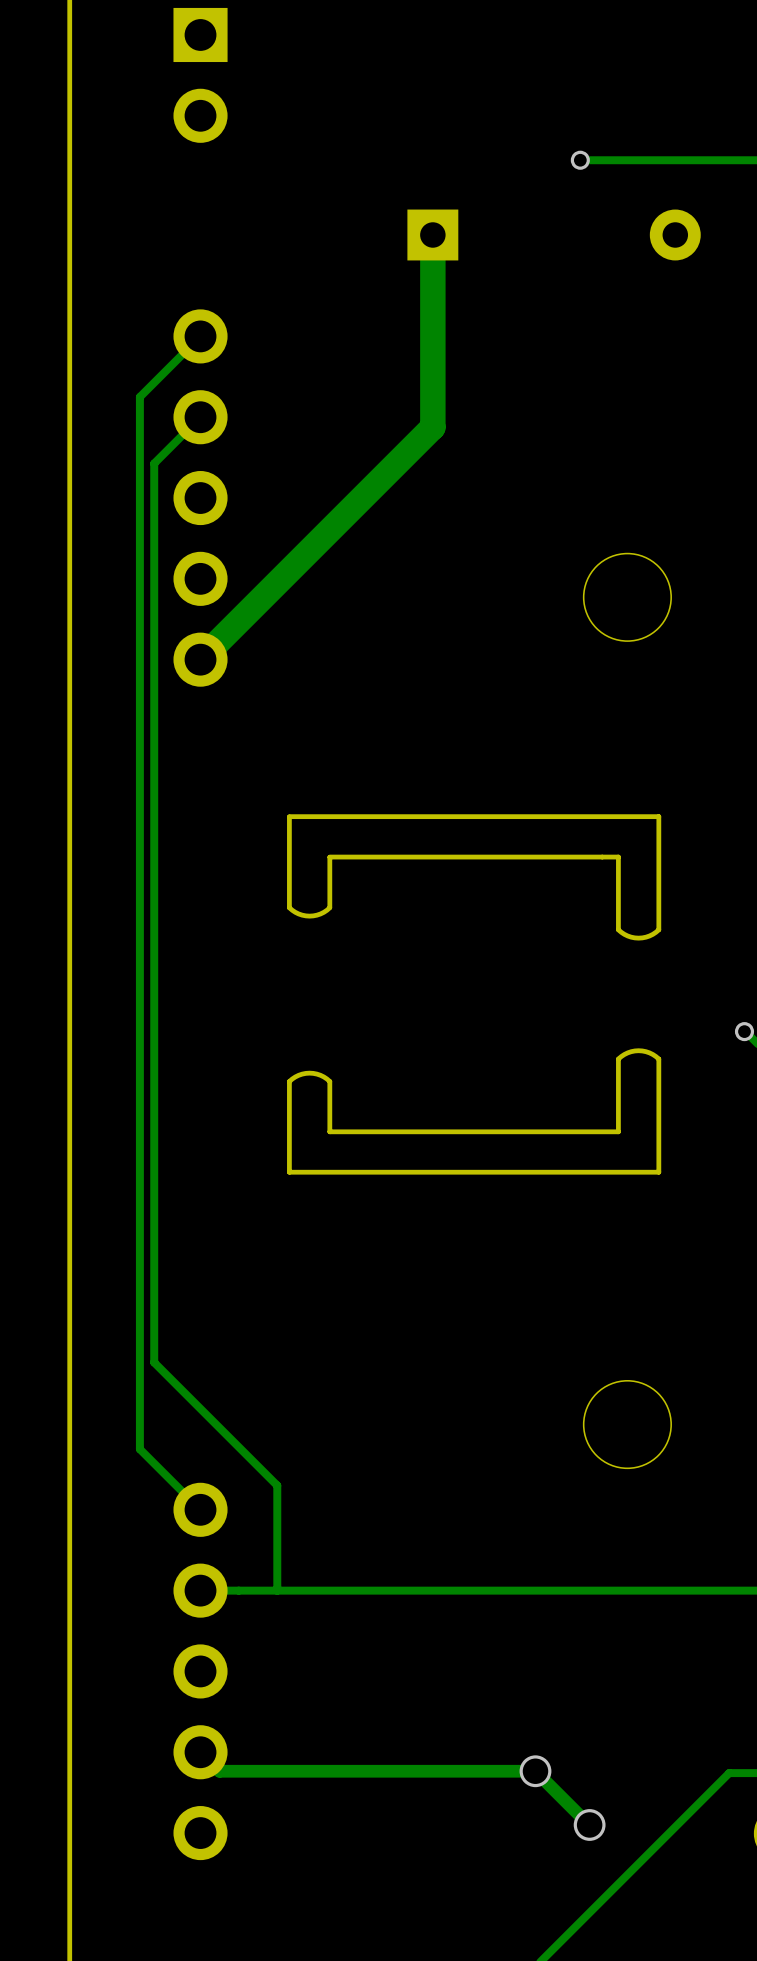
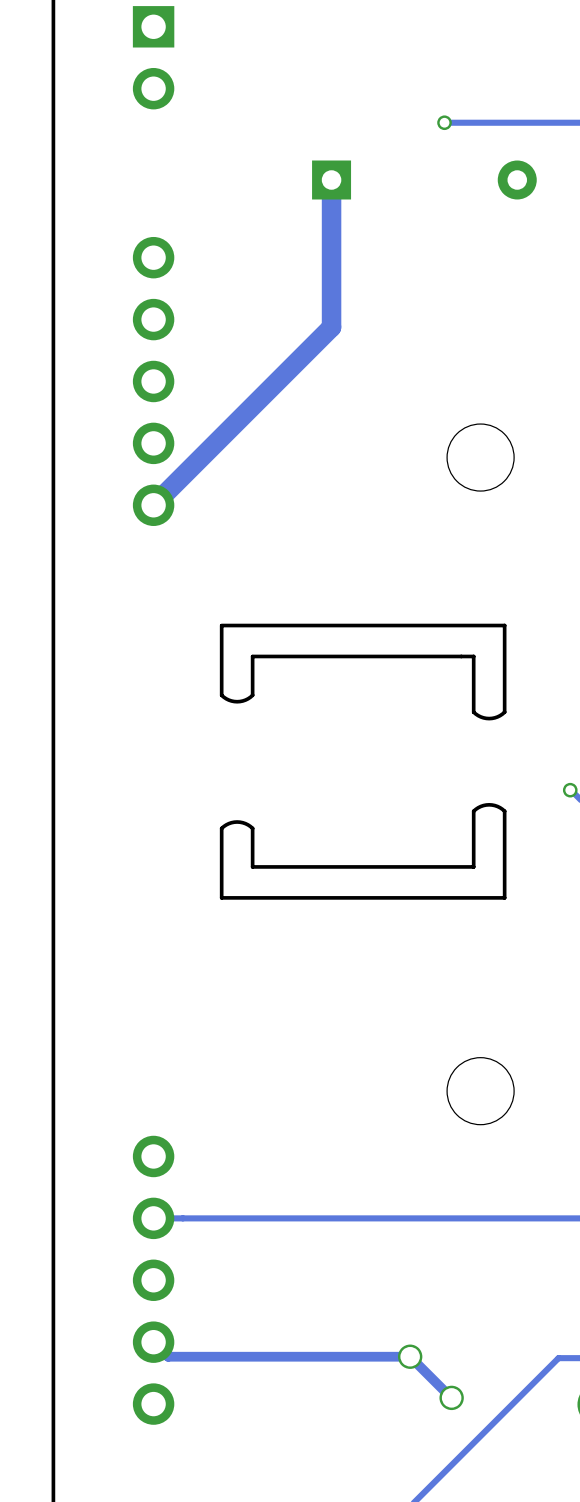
track: (200, 336) (139, 397) (139, 1449) (200, 1509) -> none
track: (200, 417) (154, 463) (154, 1362) (277, 1485) (277, 1590) -> none

